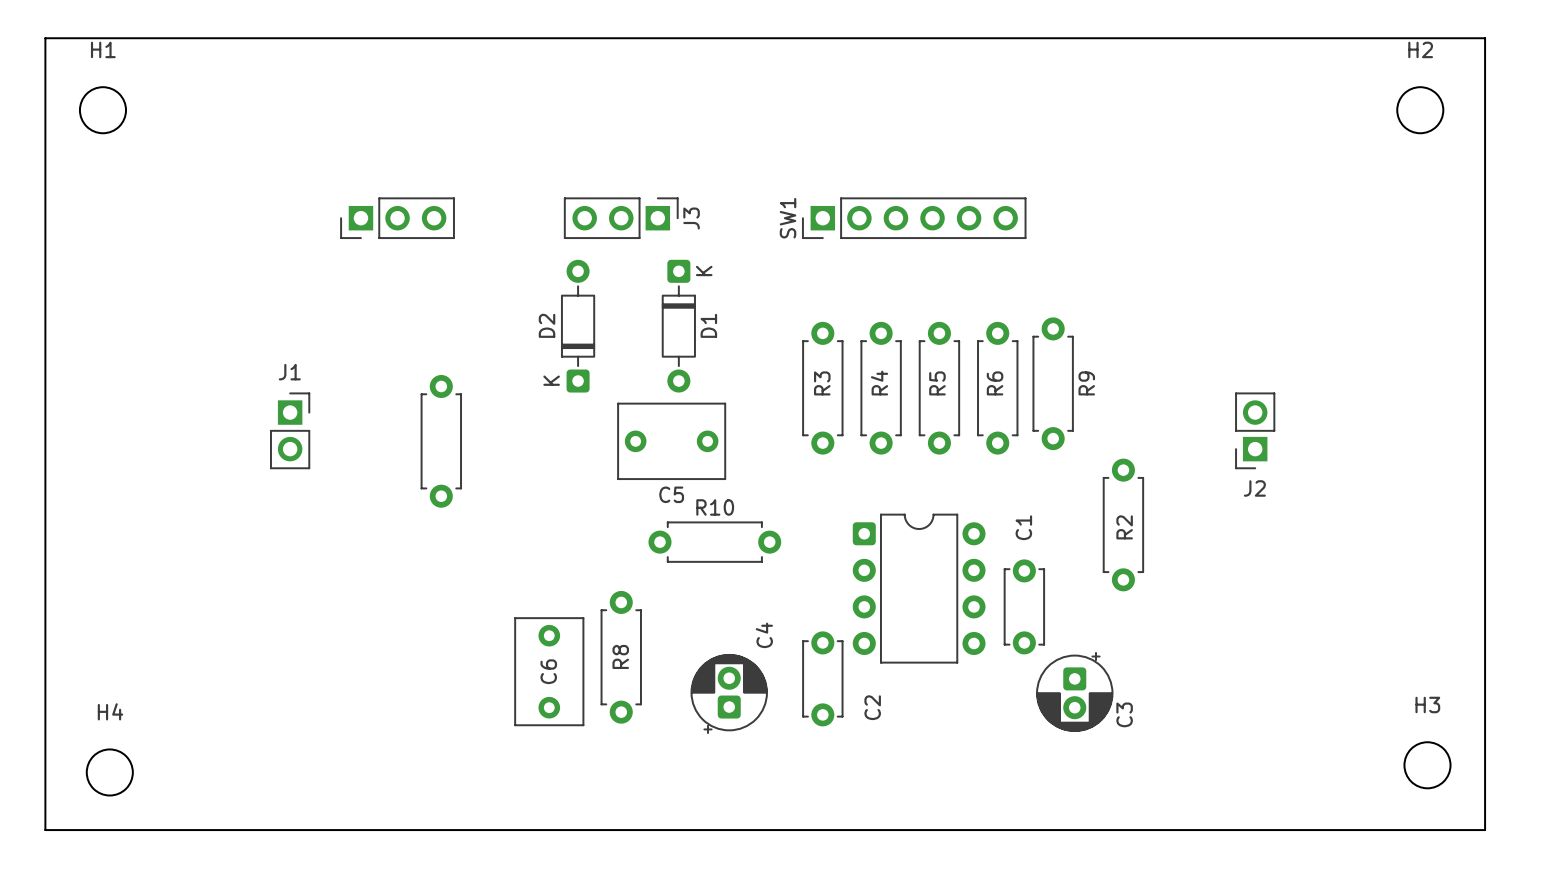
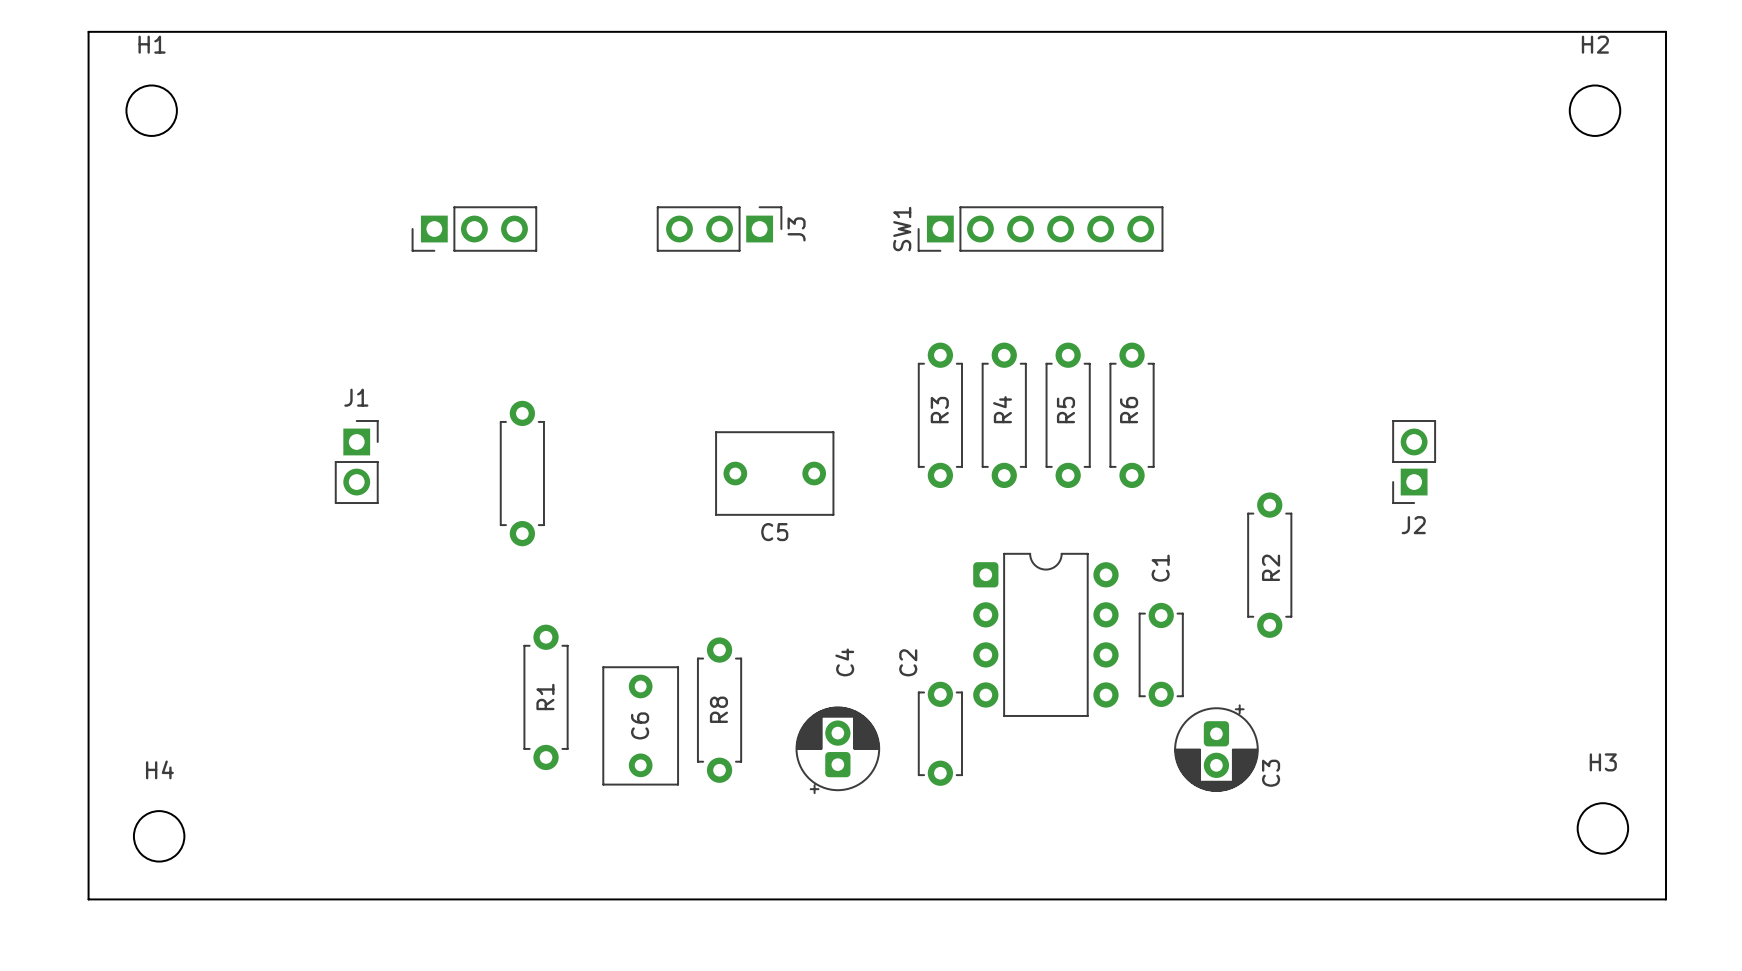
D2: (578, 326) -> none
D1: (678, 326) -> none
R9: (1053, 383) -> none
R10: (714, 542) -> none
C4 name position: C4 (764, 635) -> C4 (844, 662)
R1: none -> (546, 697)
C2 name position: C2 (872, 707) -> C2 (908, 662)

